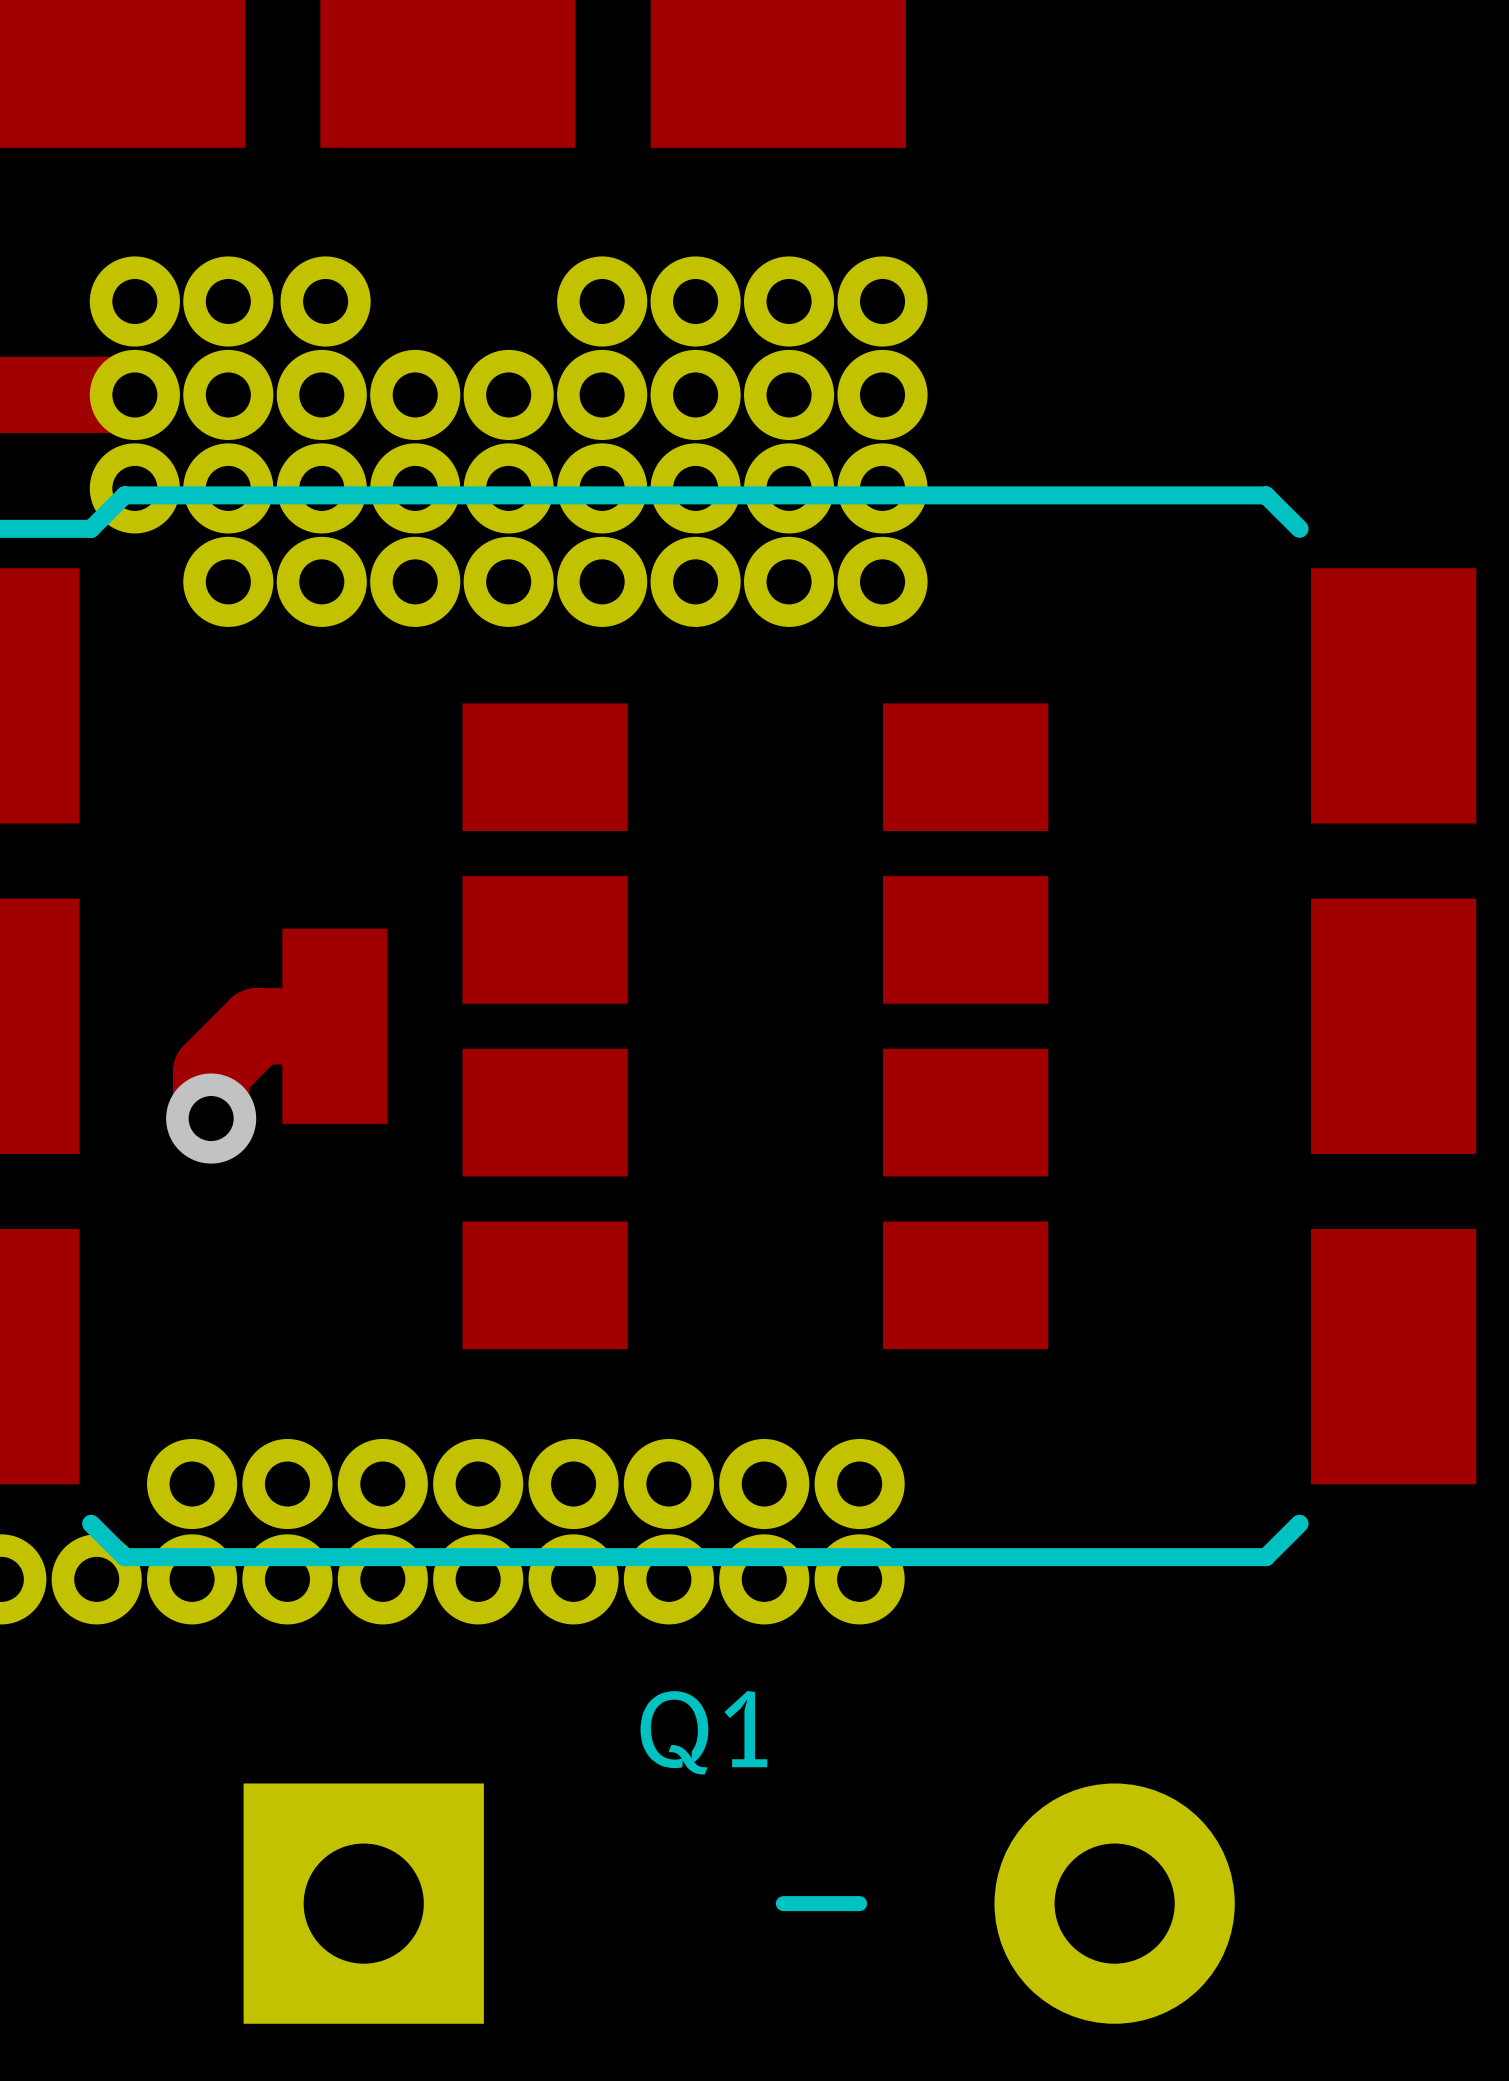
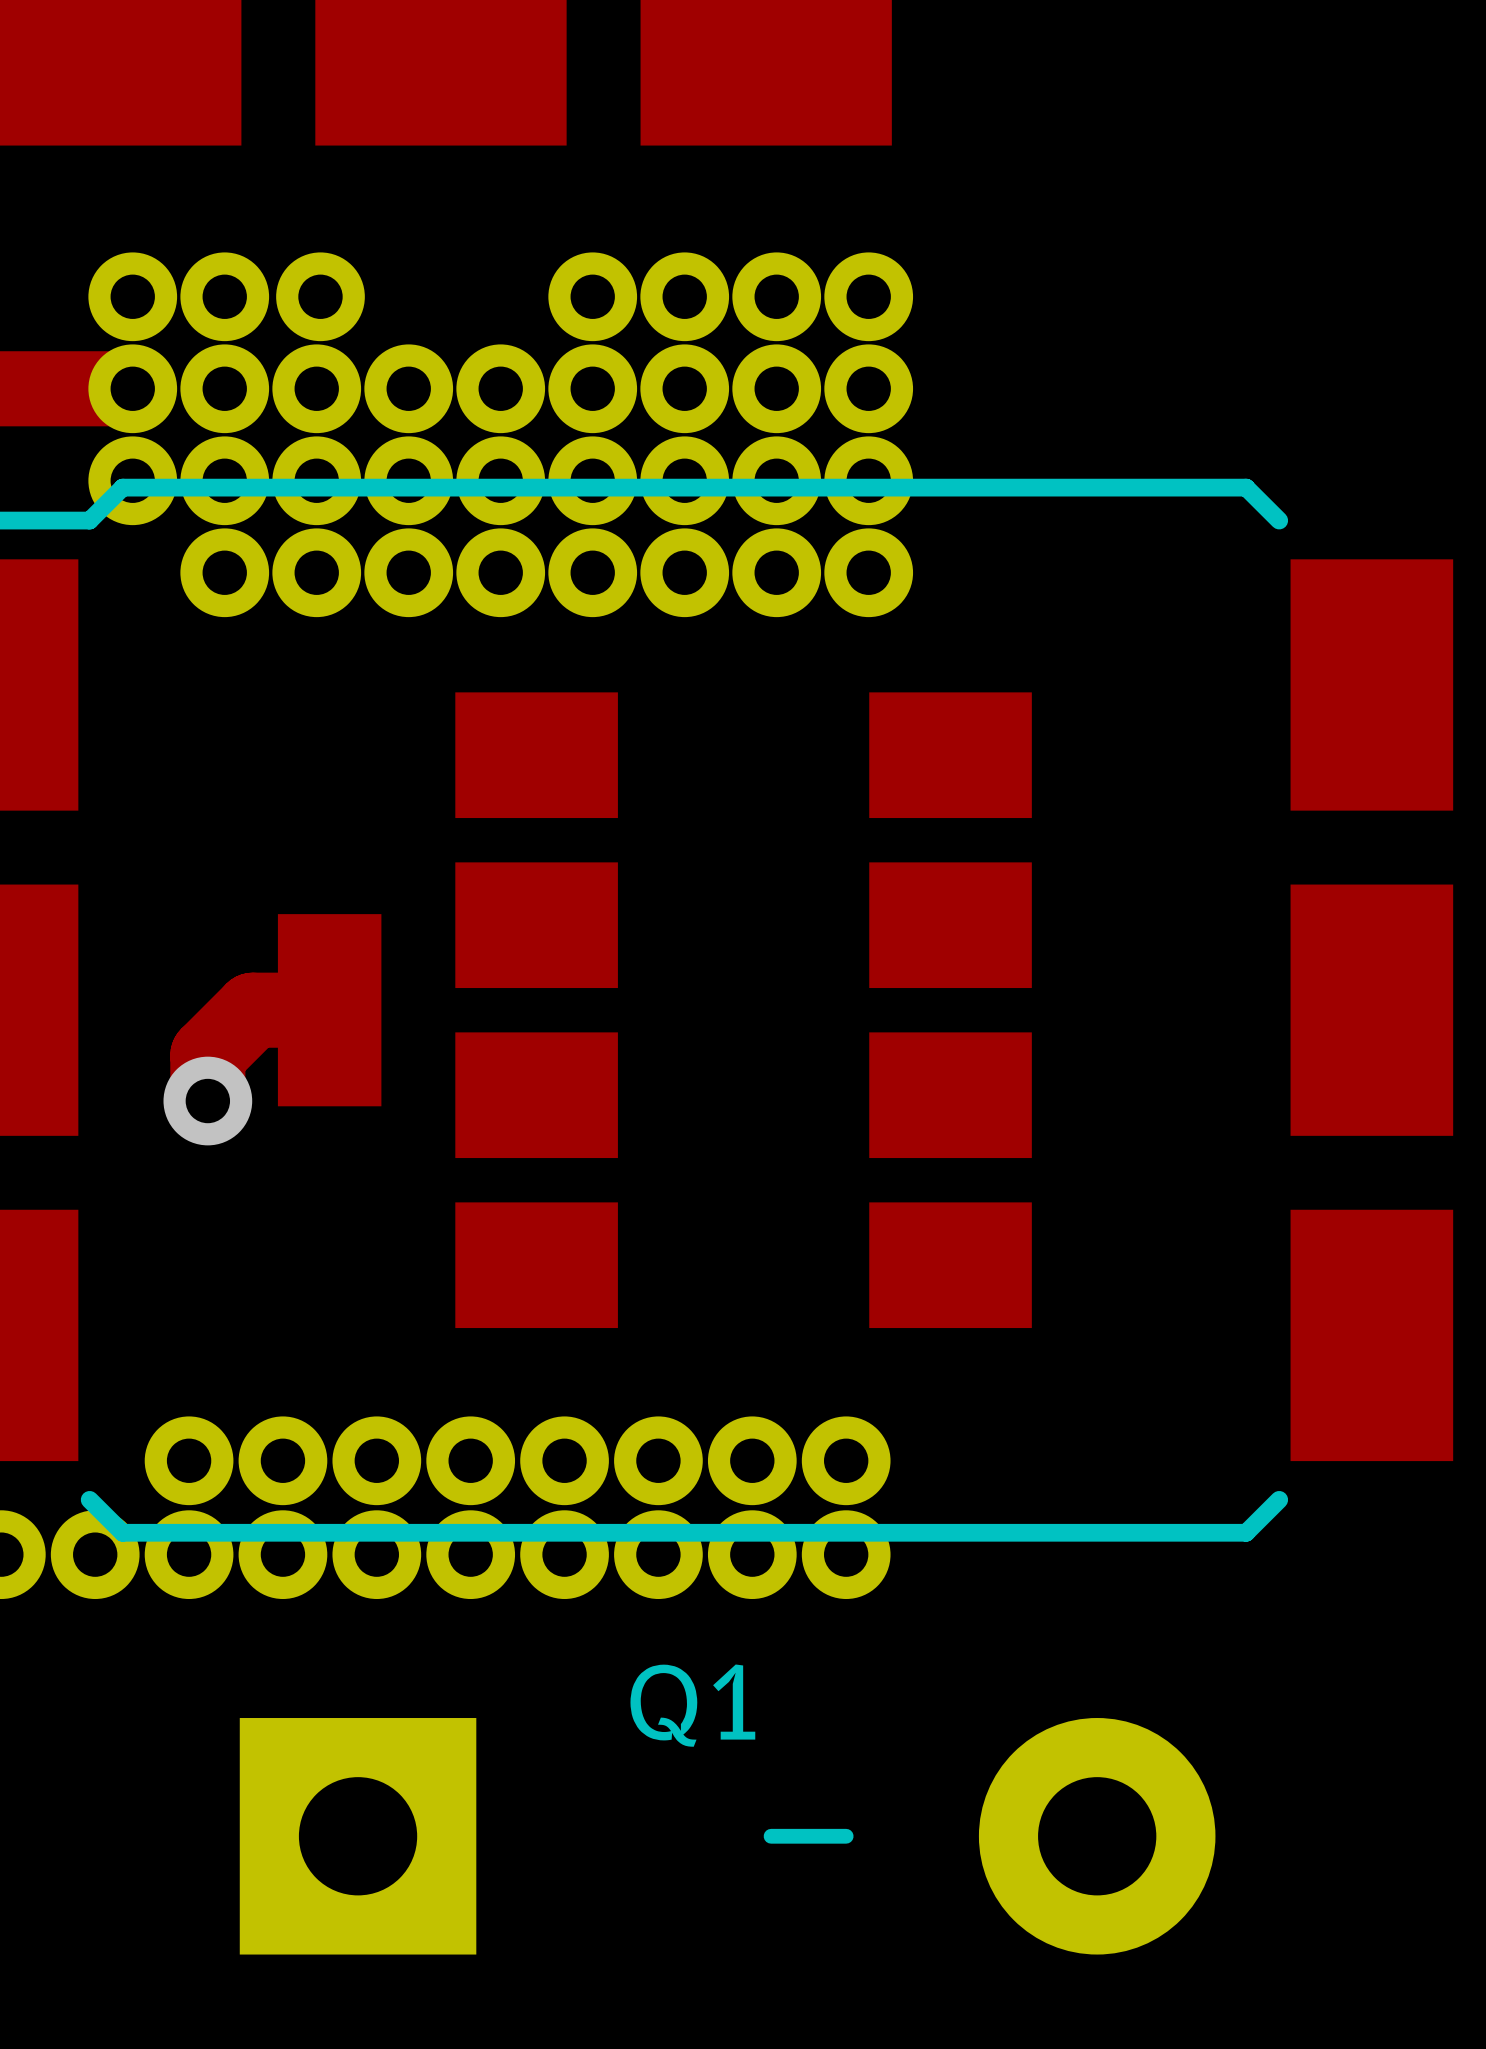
part position: (739, 1903) -> (727, 1836)

